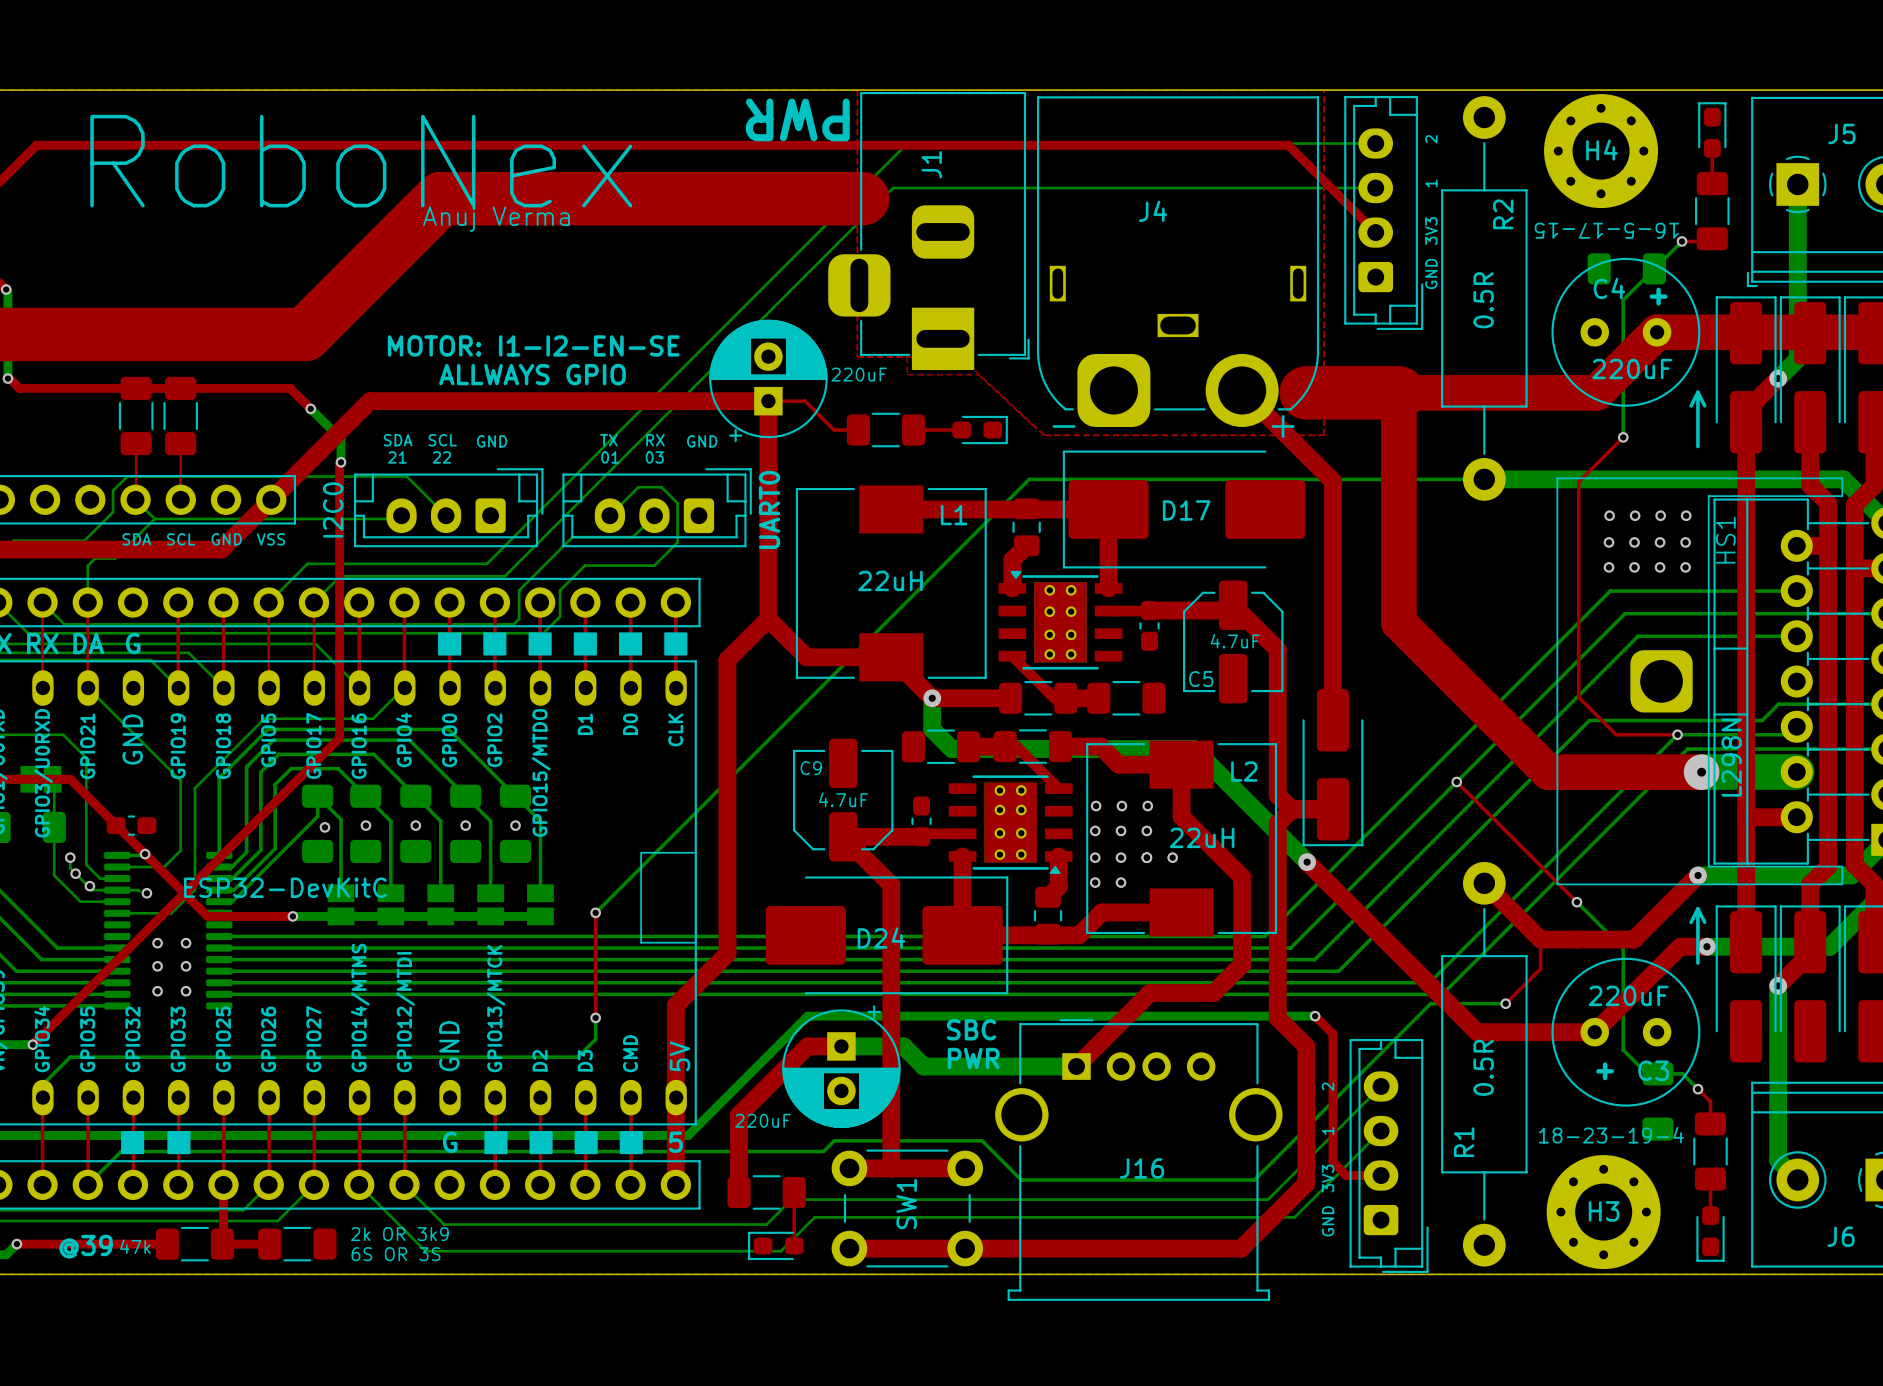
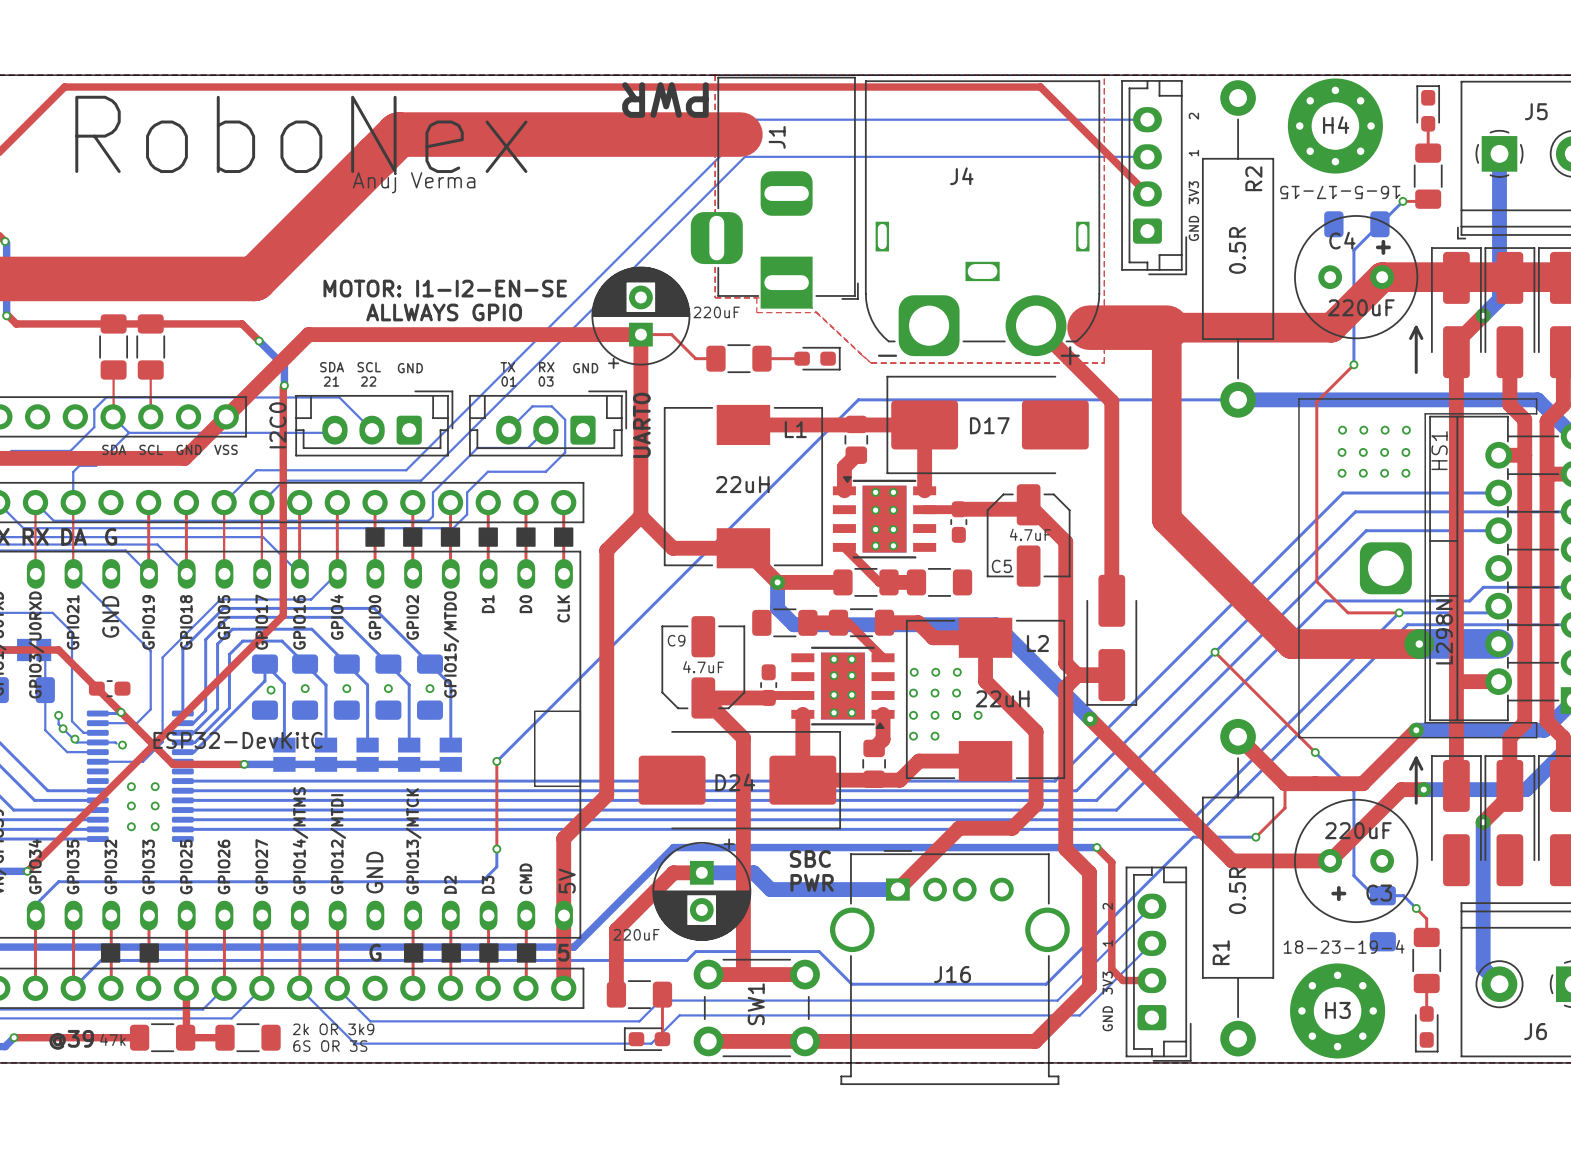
top track: (36, 145) (1288, 145) -> (30, 121) (64, 87) (1040, 87) (1074, 121)
top track: (440, 198) (862, 198) -> (367, 165) (398, 134) (740, 134)

